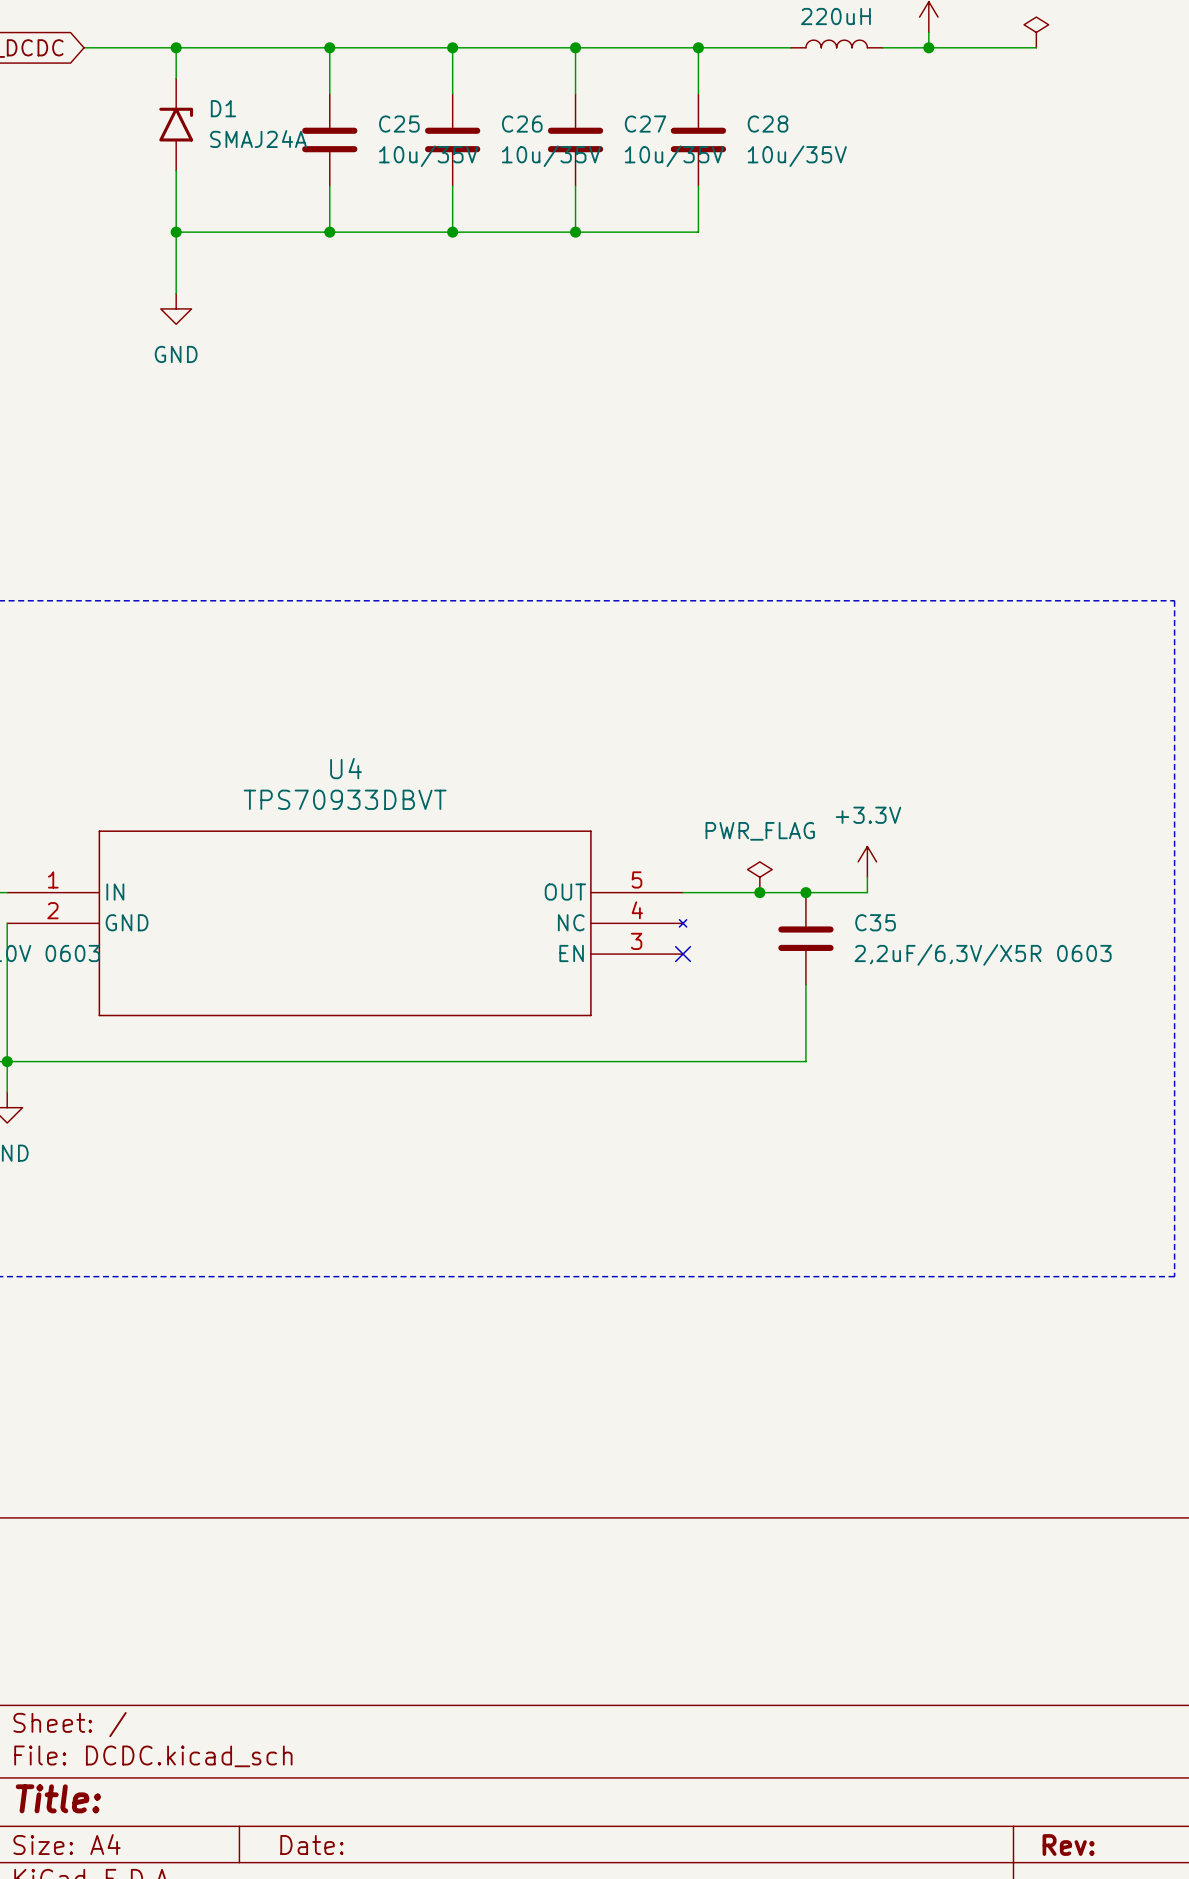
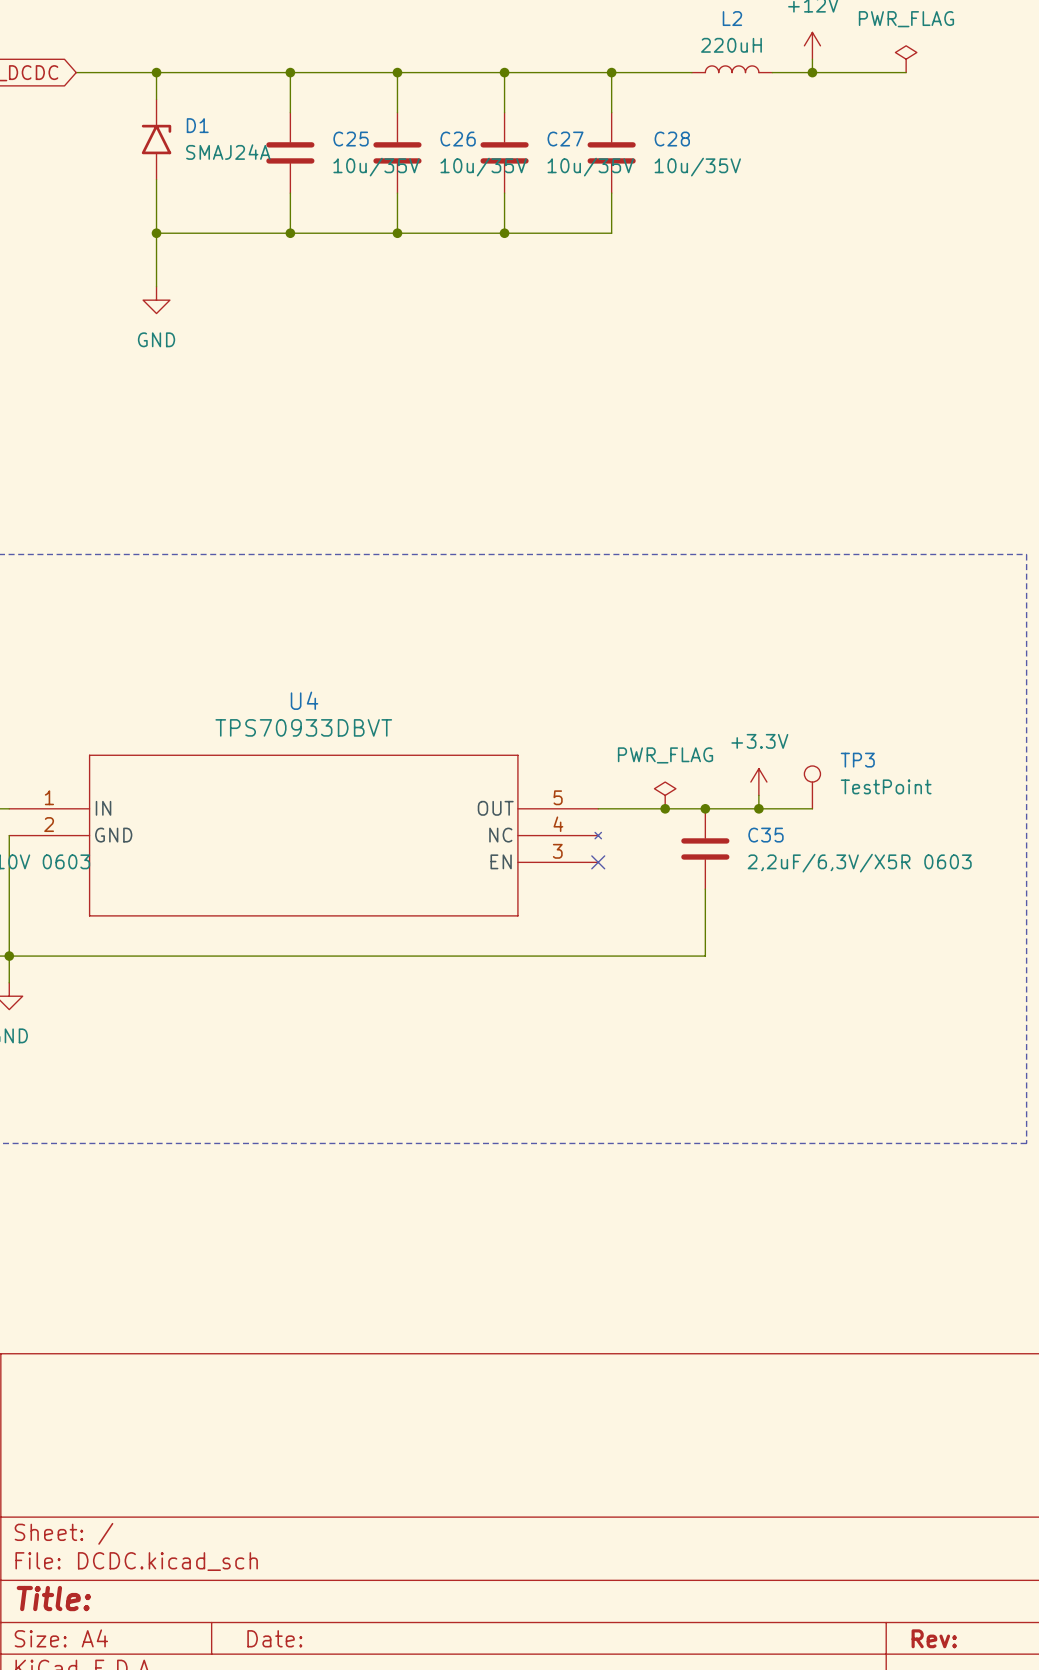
TP3: none -> TestPoint (812, 787)
wire: none -> (758, 808) (812, 808)
junction: none -> (758, 808)

